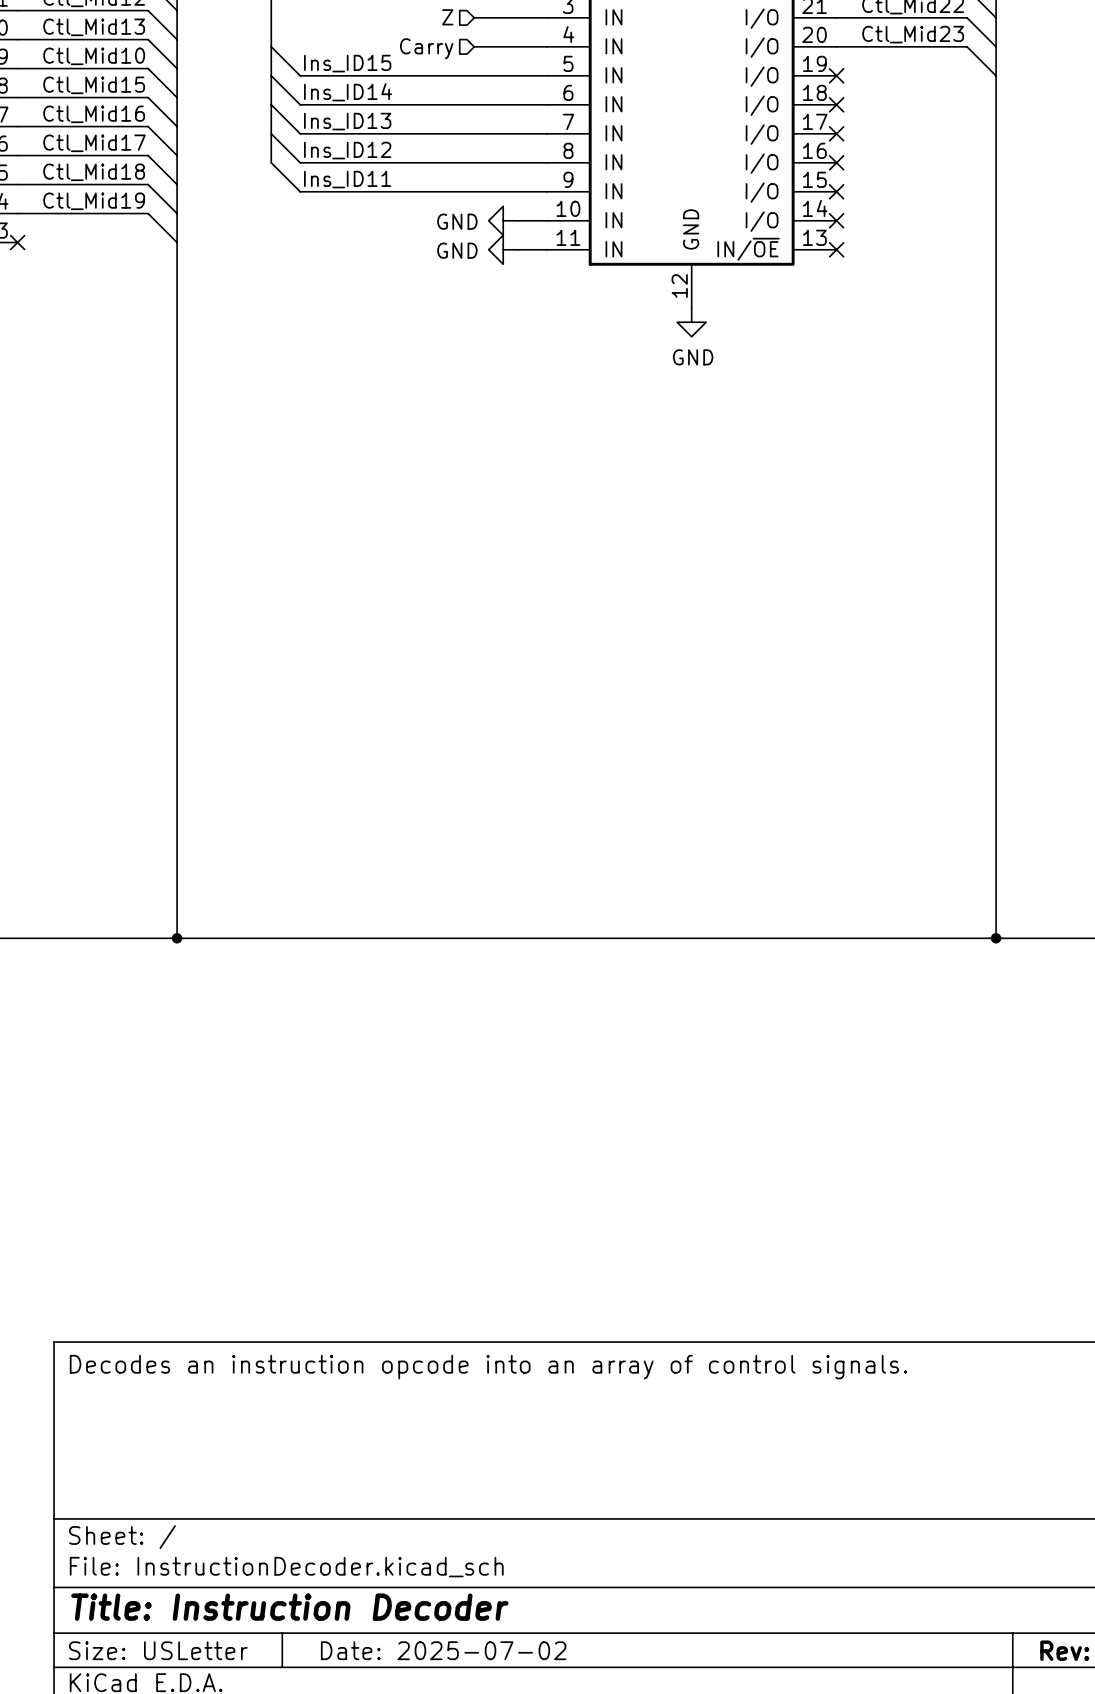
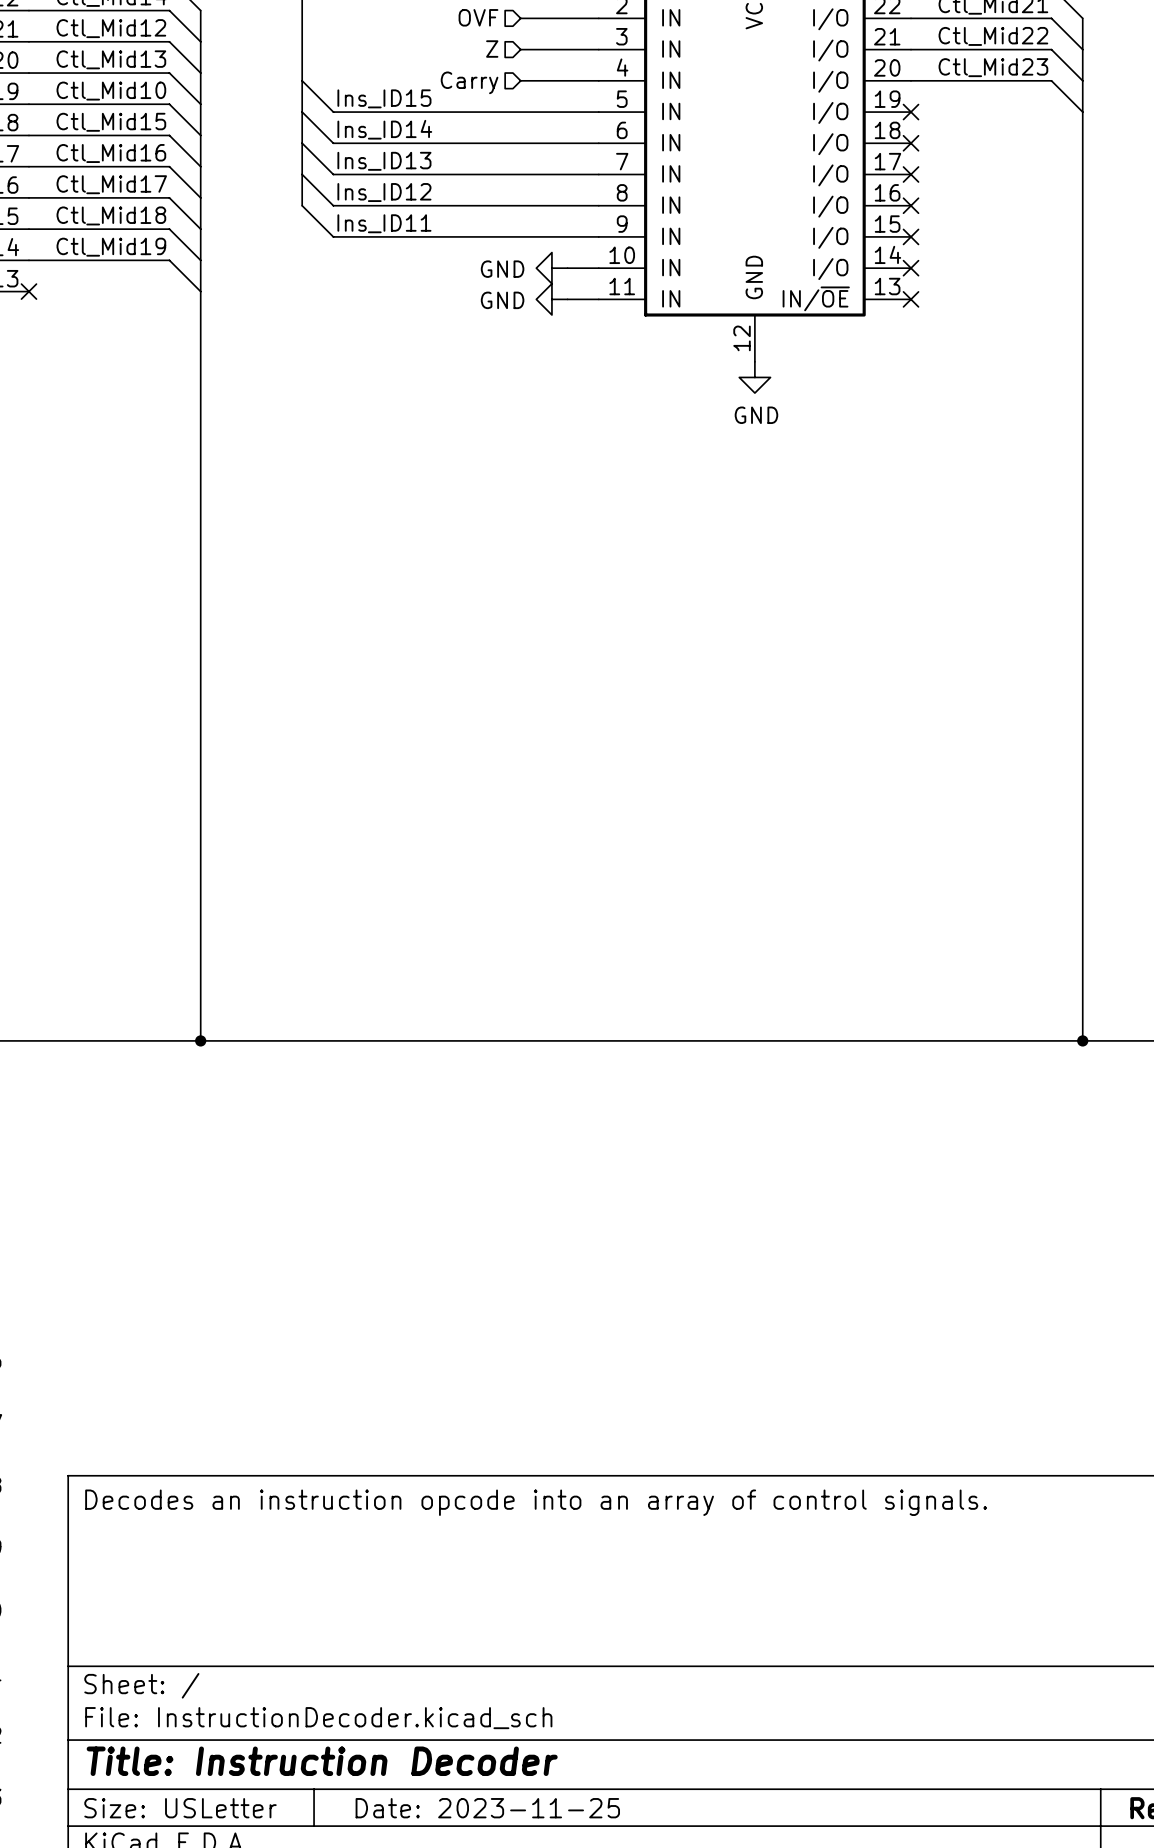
title block: Date: 2025-07-02 (443, 1650) -> Date: 2023-11-25 (487, 1808)

